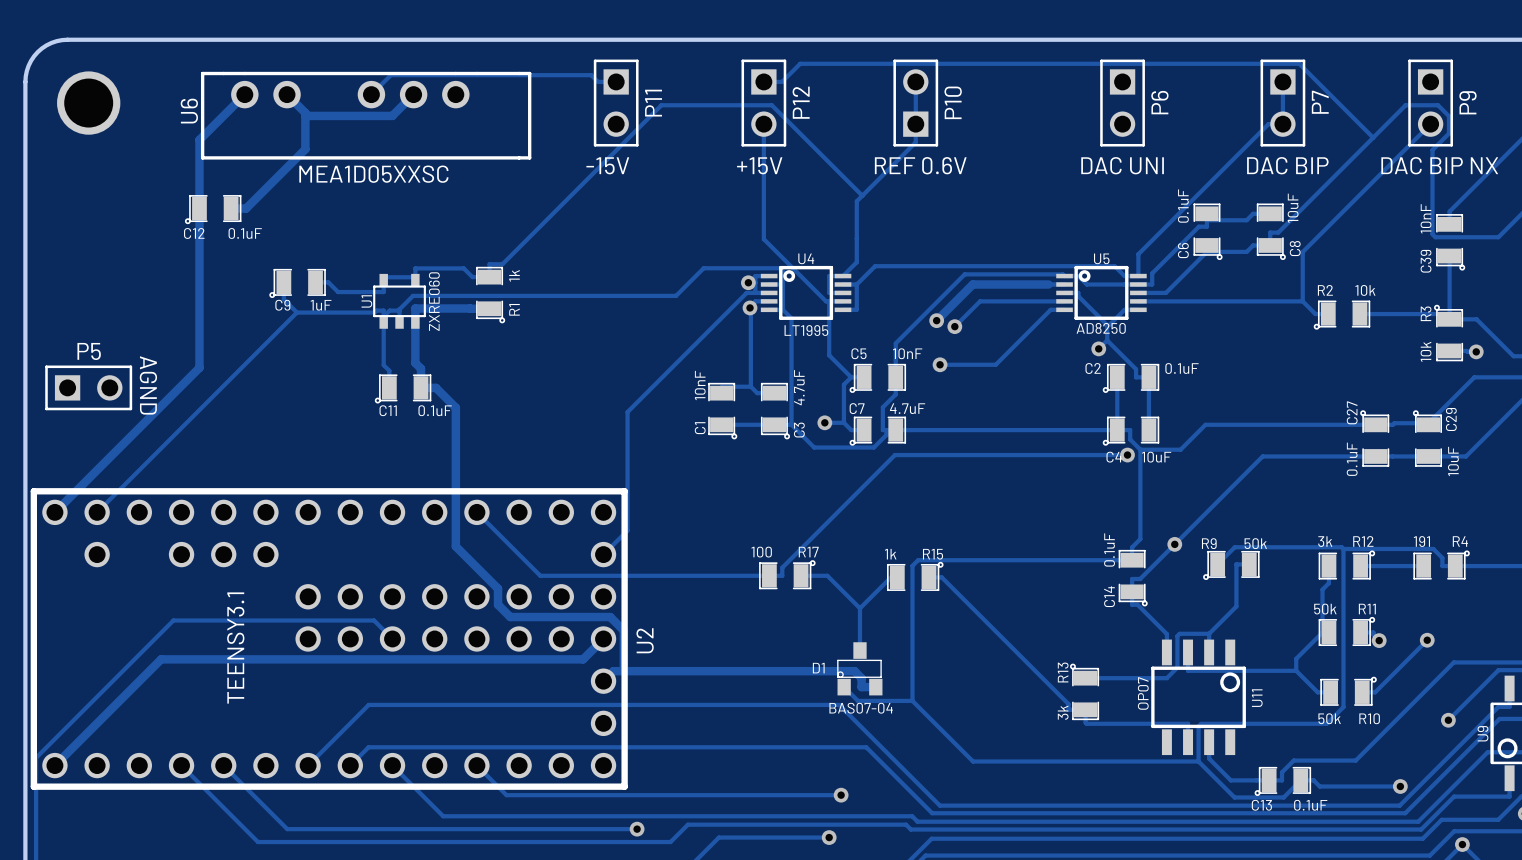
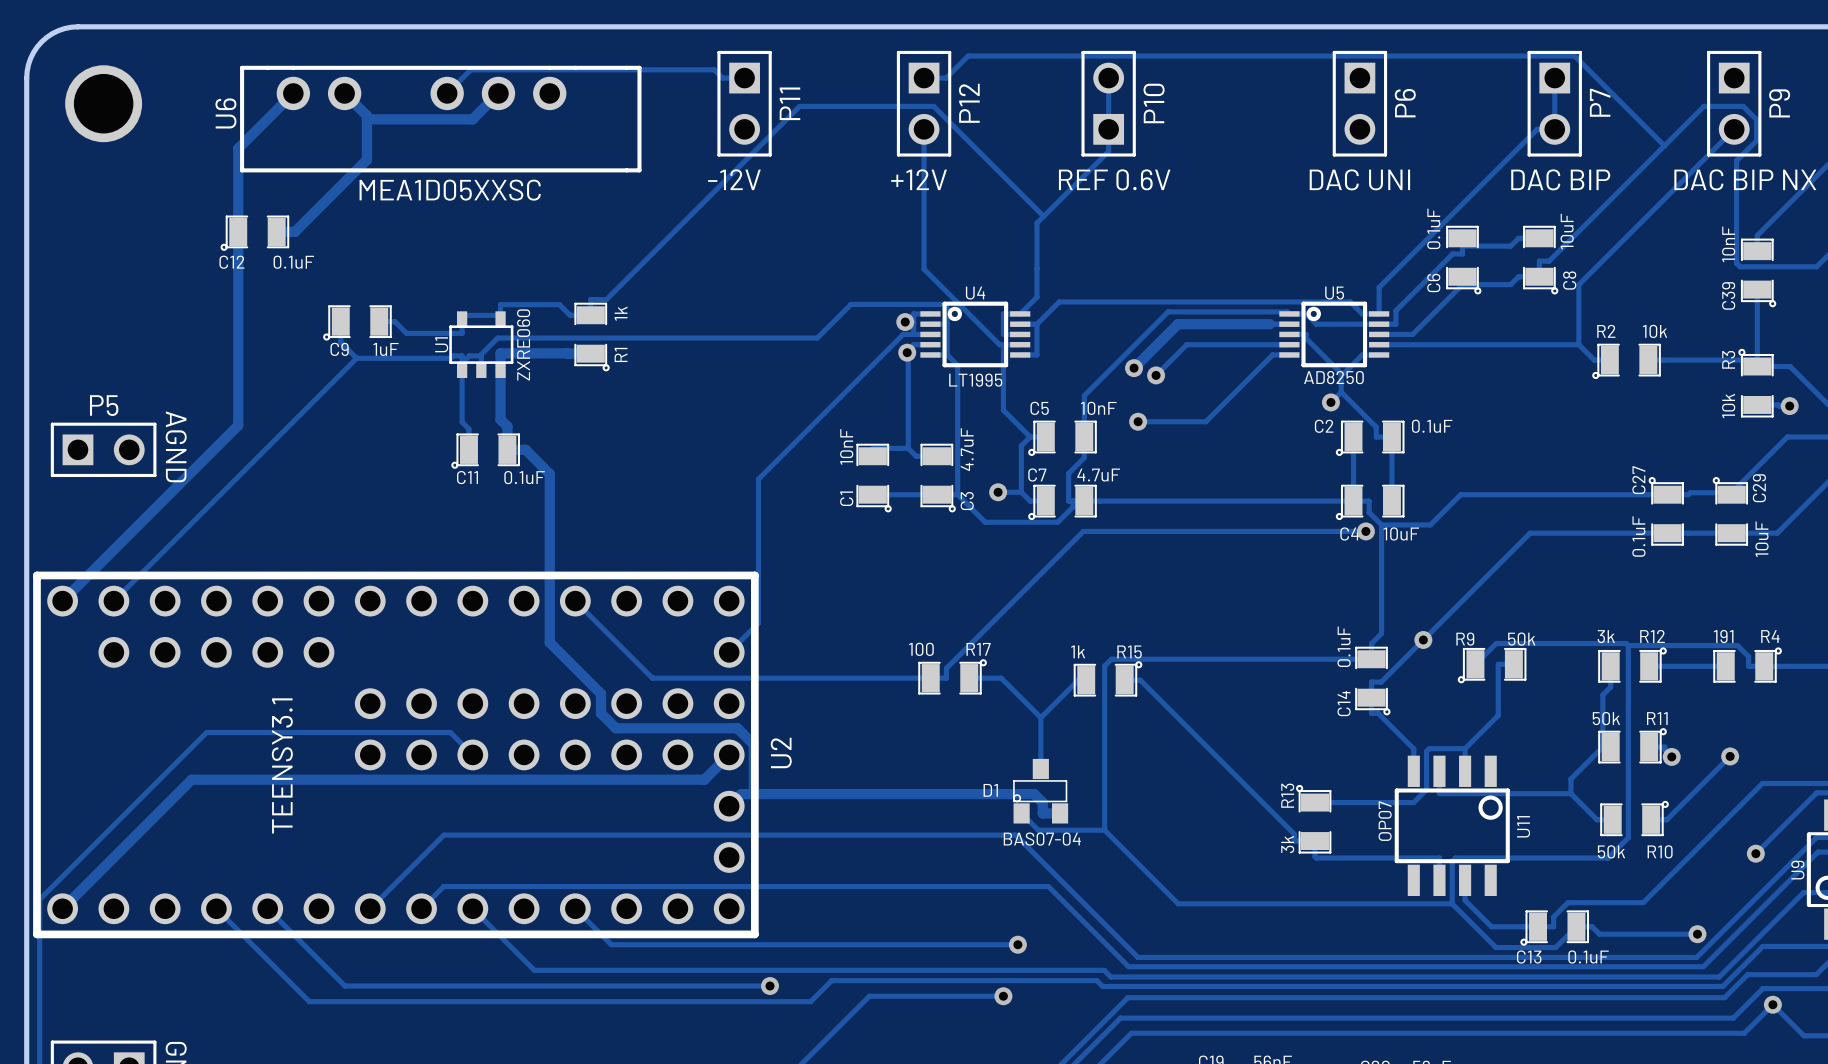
text: -15V (607, 165) -> -12V (734, 179)
text: +15V (759, 165) -> +12V (919, 179)
U2 footprint: [30, 488, 628, 790] -> [33, 571, 759, 939]

